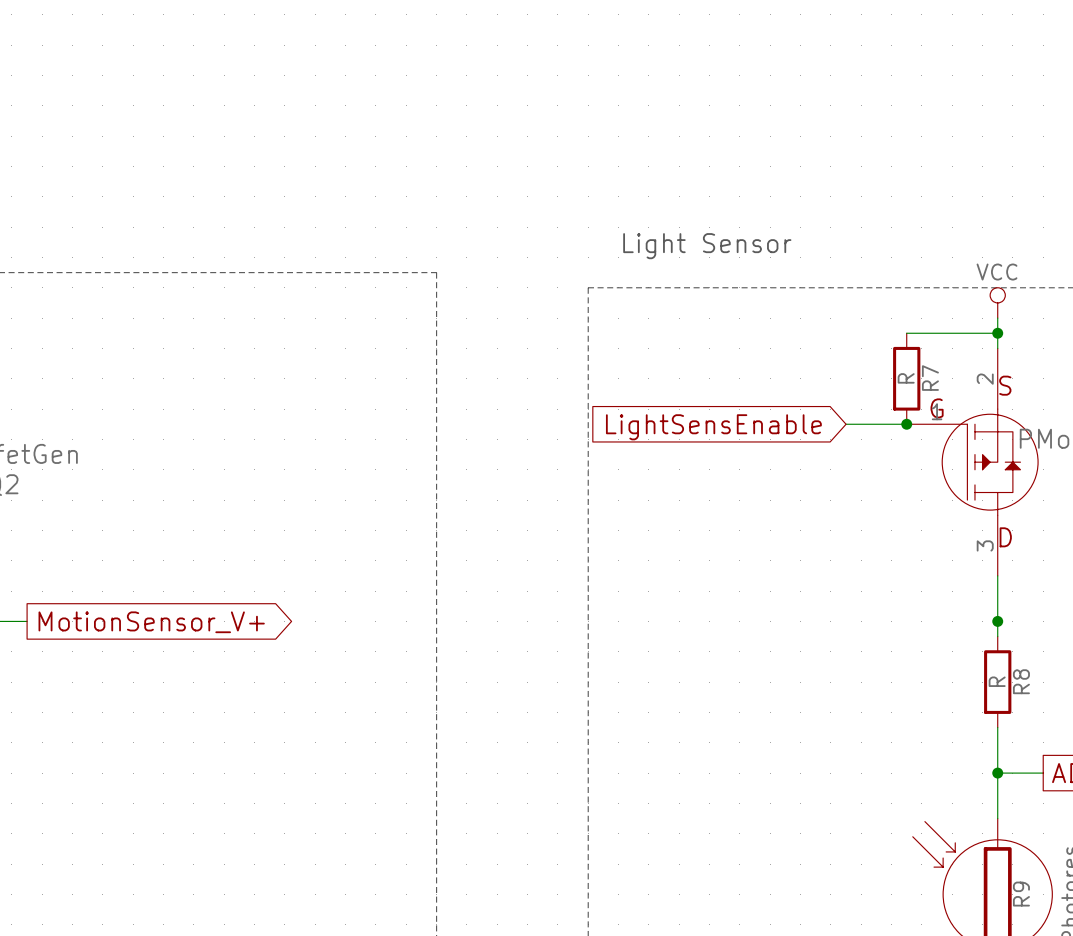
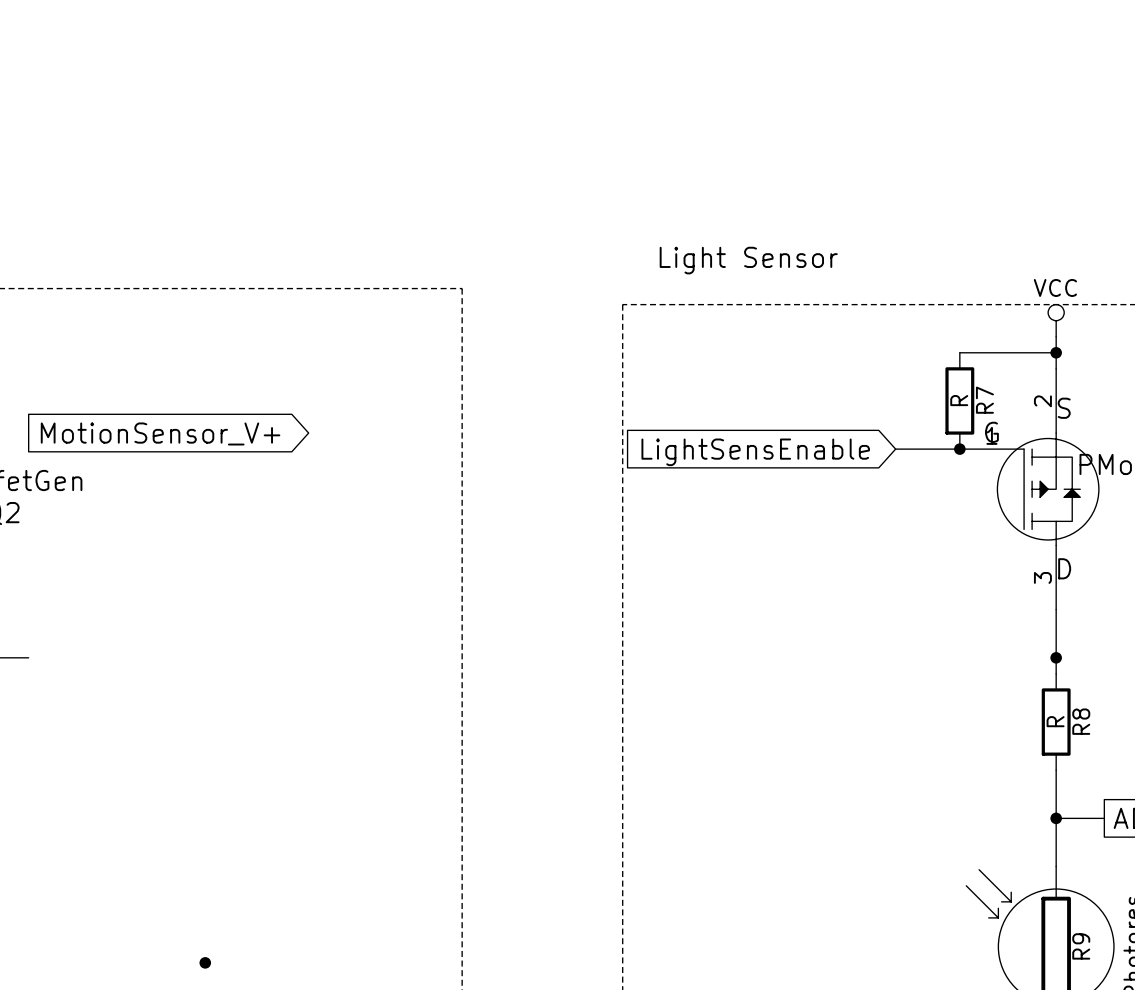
global label position: MotionSensor_V+ (151, 622) -> MotionSensor_V+ (160, 433)
junction: none -> (205, 962)

